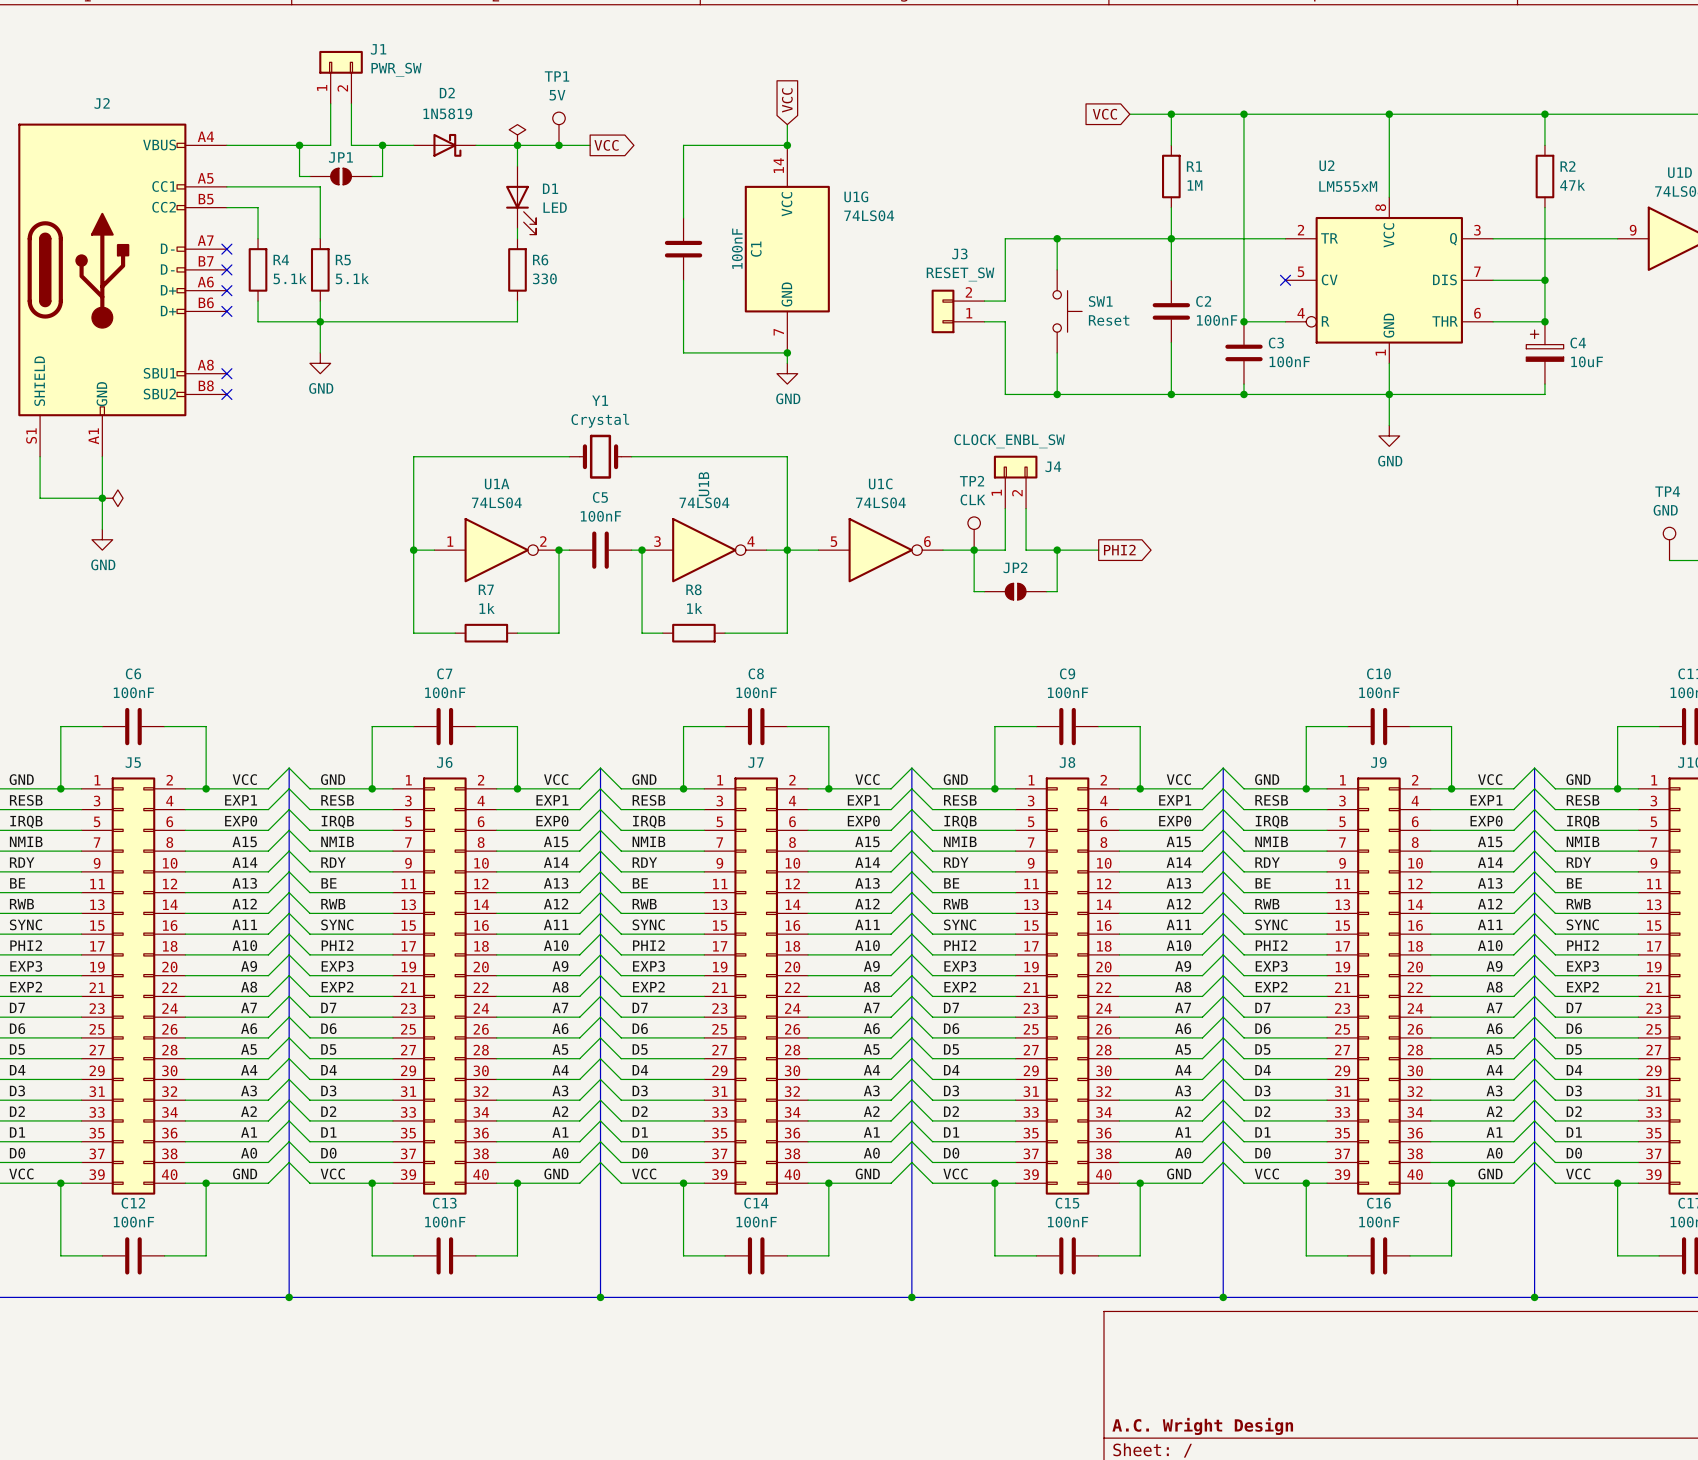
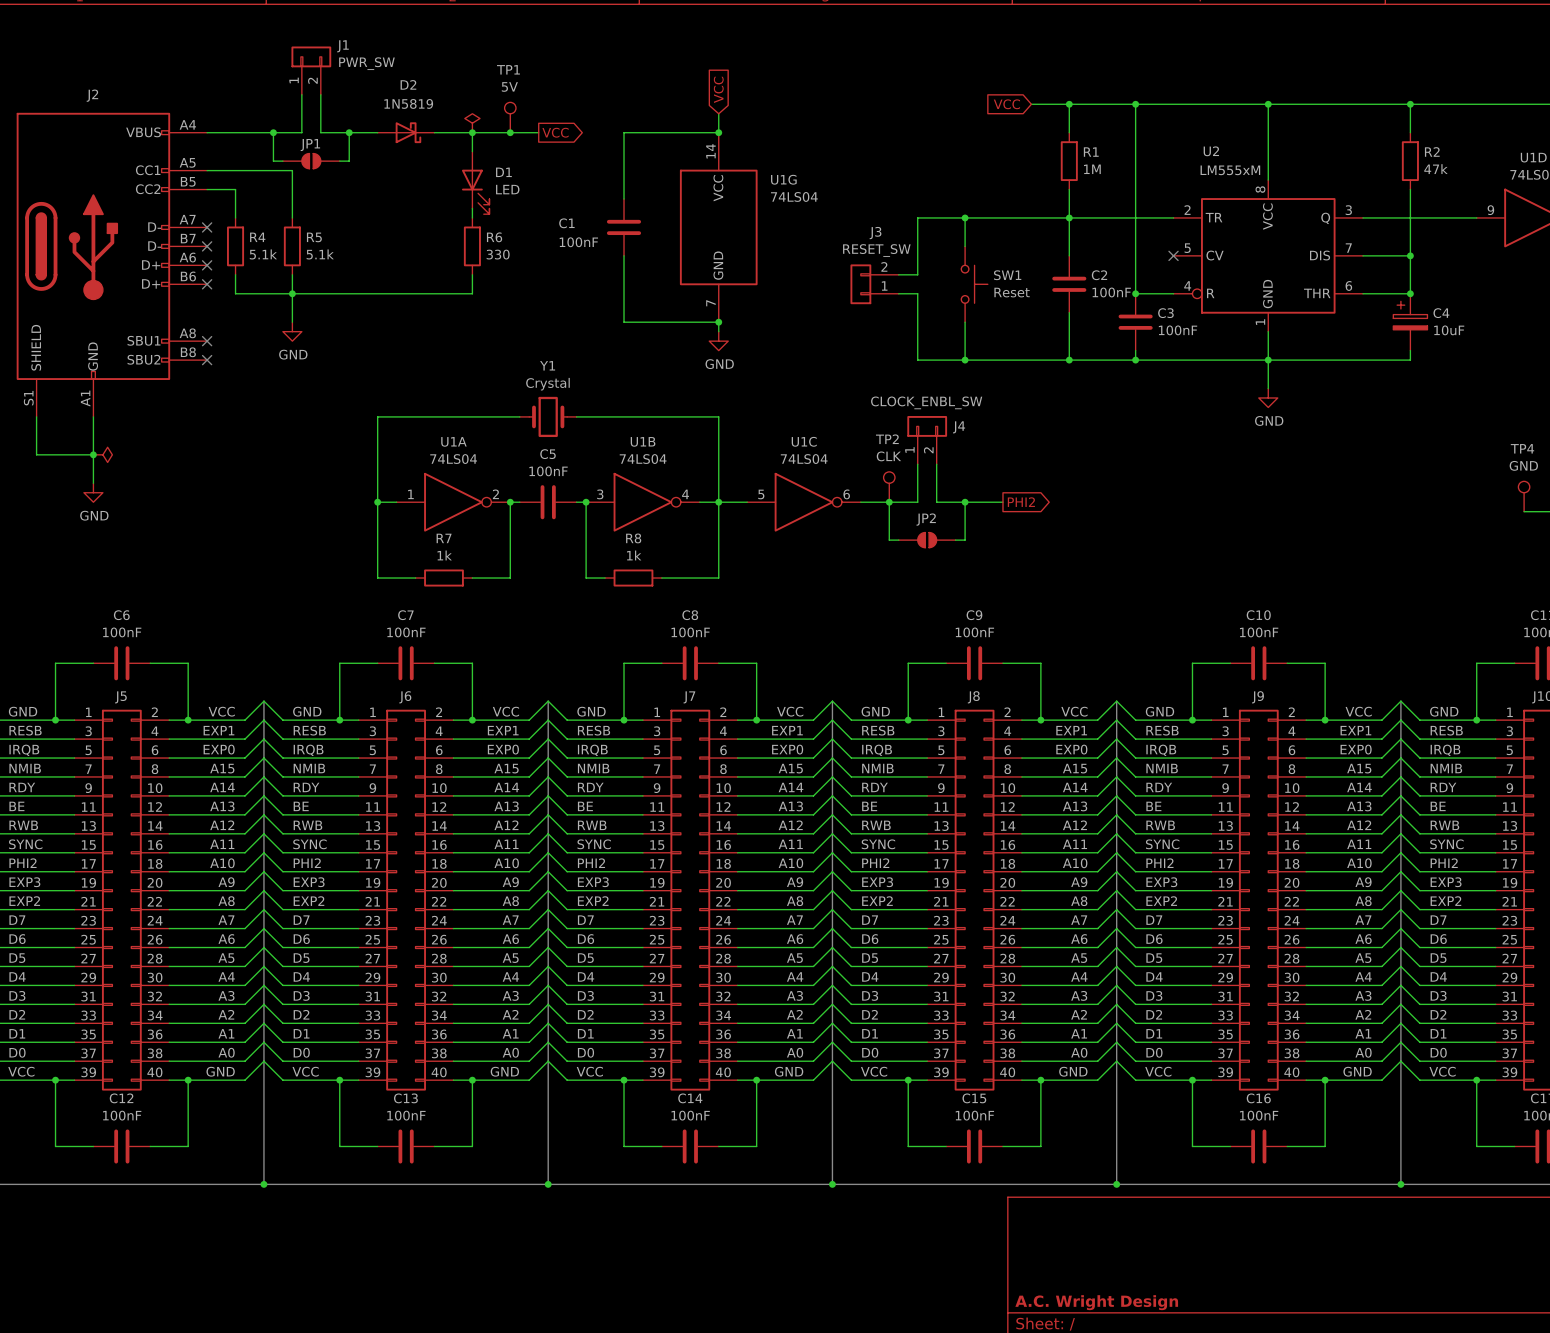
C1 value rotation: 0° (737, 248) -> 90° clockwise (578, 242)
C1 value position: 100nF (737, 248) -> 100nF (578, 242)
C1 name rotation: 0° (756, 249) -> 90° clockwise (566, 223)
C1 name position: C1 (756, 249) -> C1 (566, 223)
U1B name rotation: 0° (704, 484) -> 90° clockwise (643, 441)

